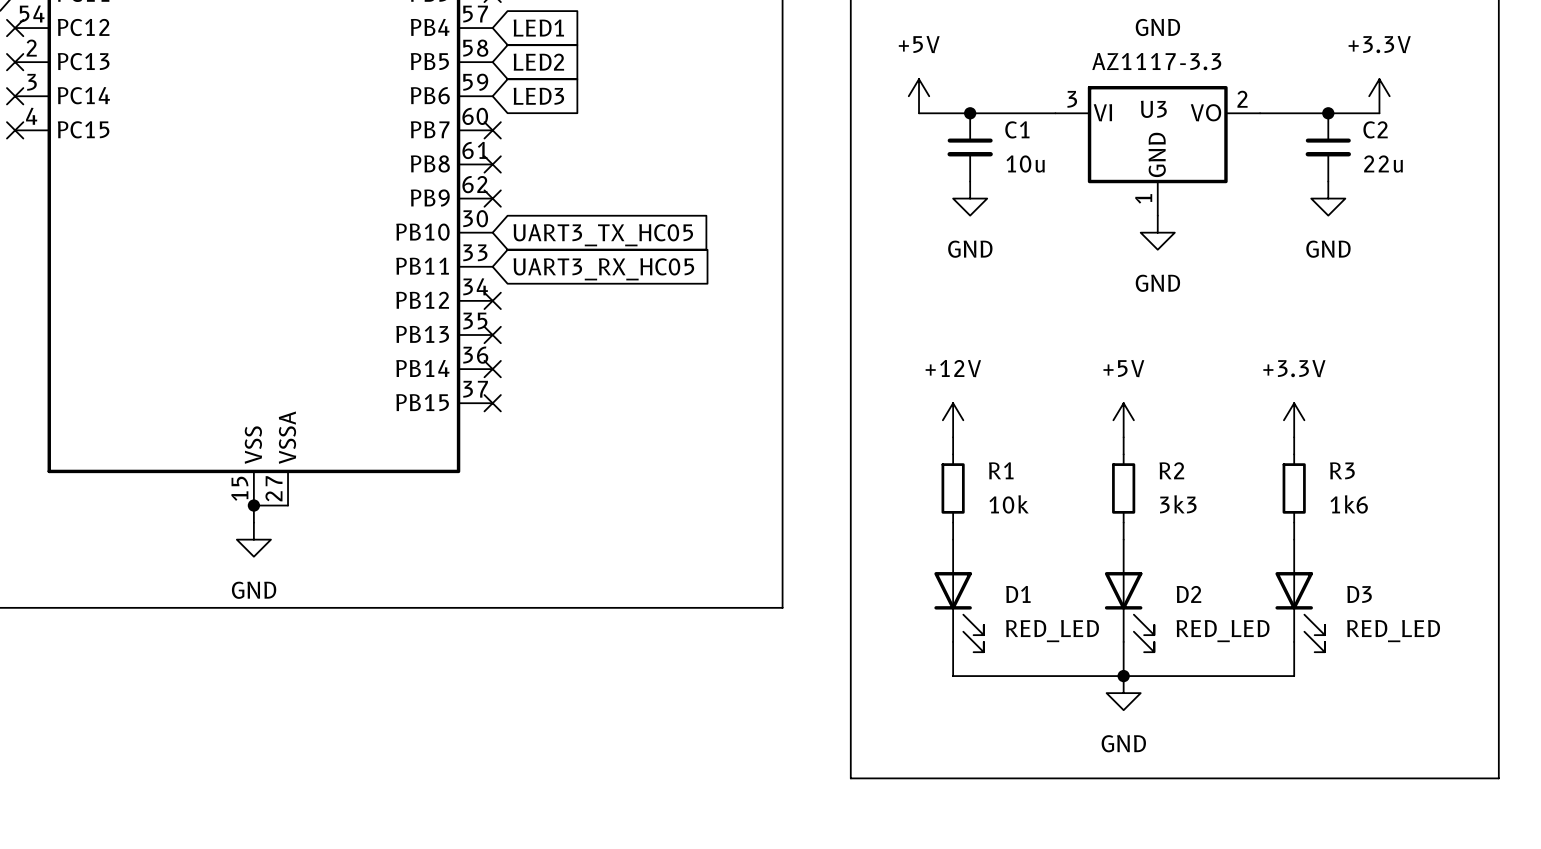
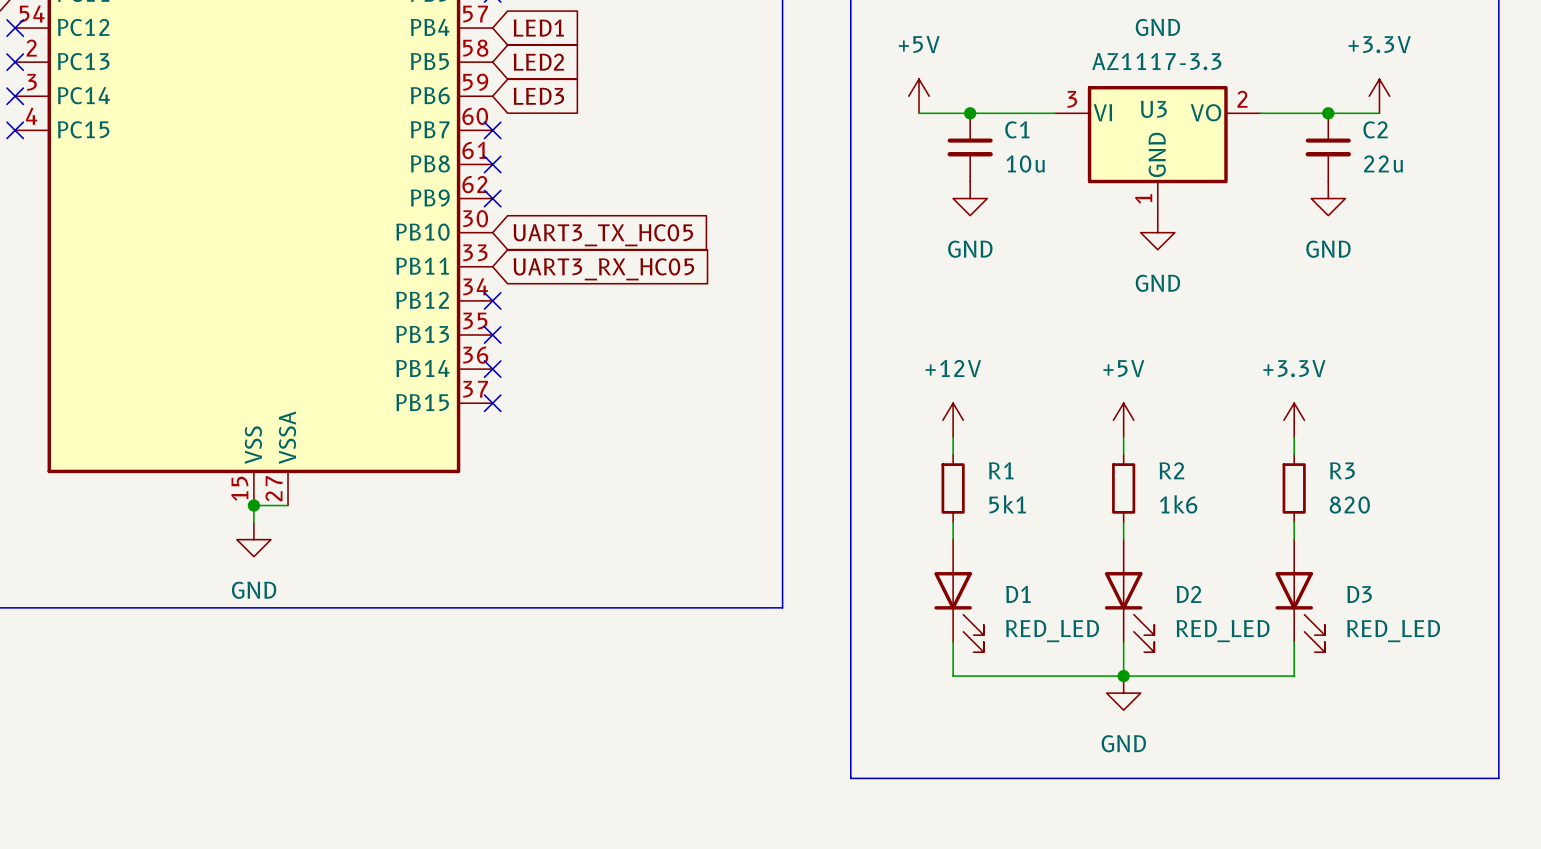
R1 value: 10k (1009, 504) -> 5k1 (1007, 504)
R2 value: 3k3 (1178, 504) -> 1k6 (1178, 504)
R3 value: 1k6 (1349, 504) -> 820 (1349, 505)

